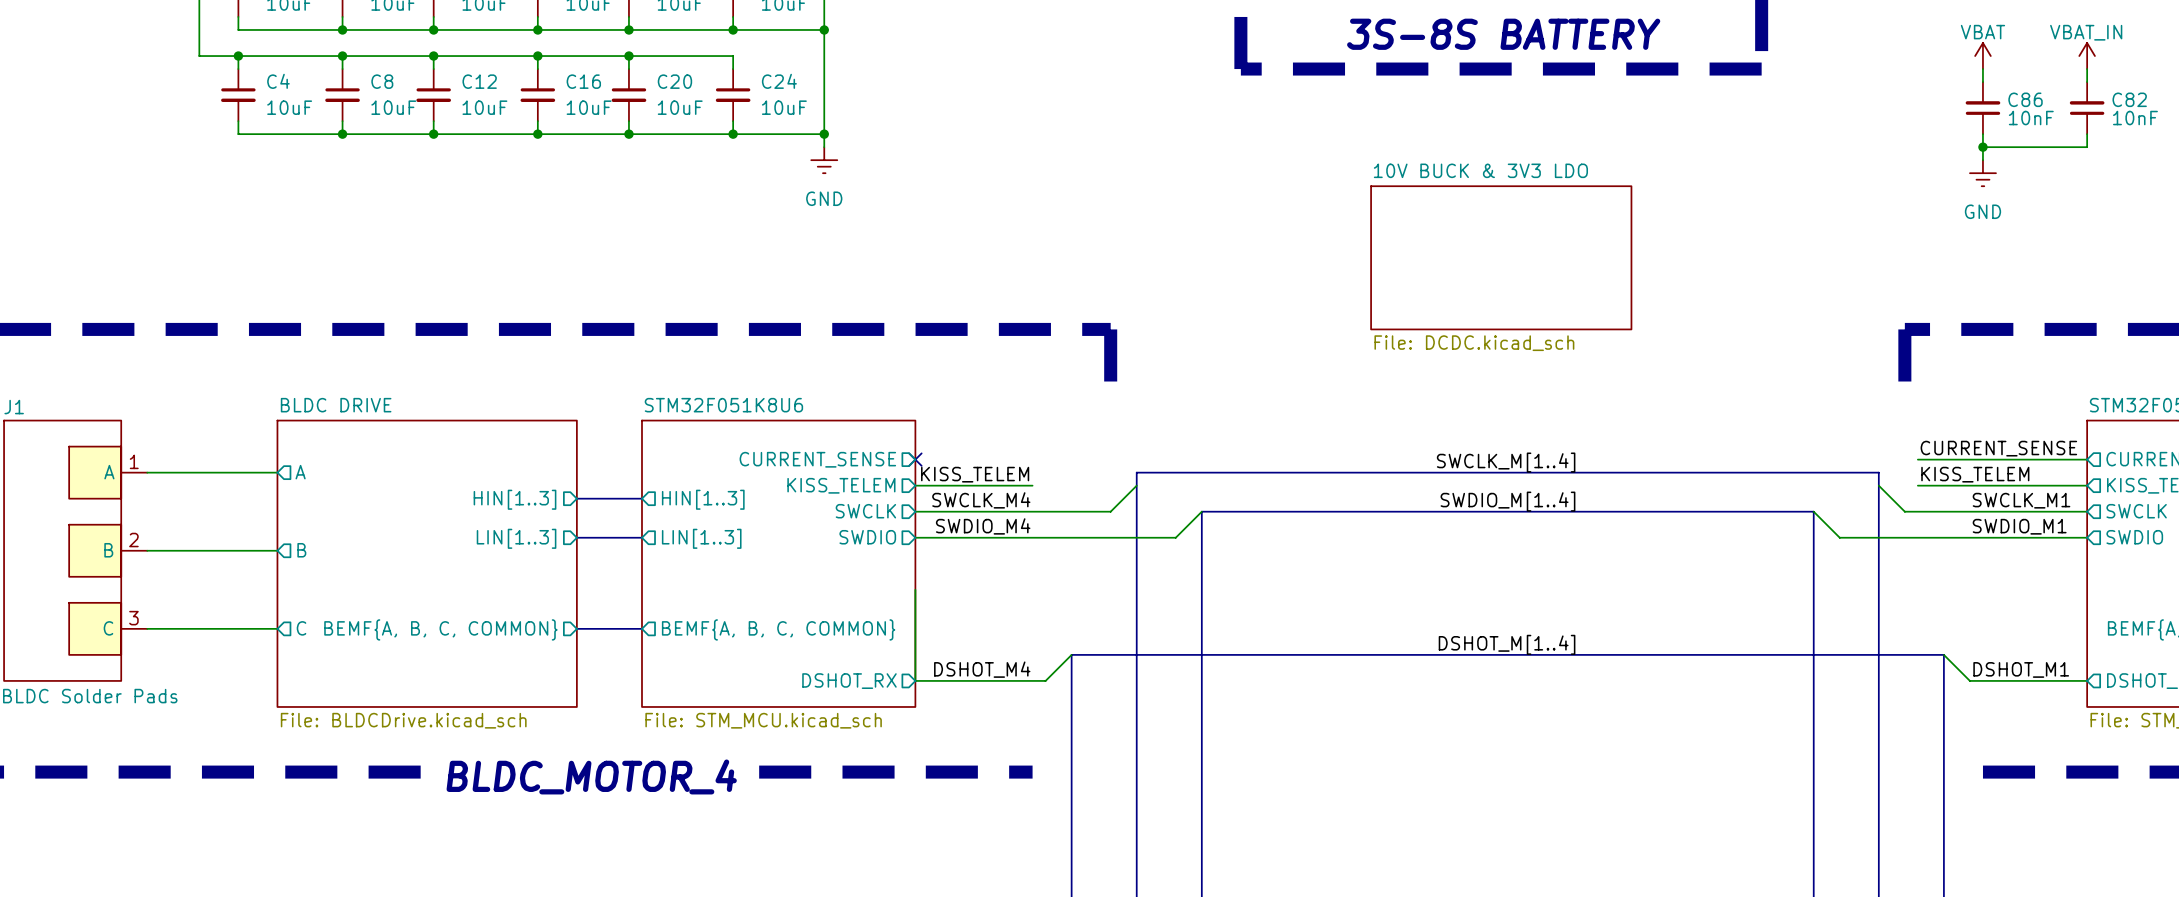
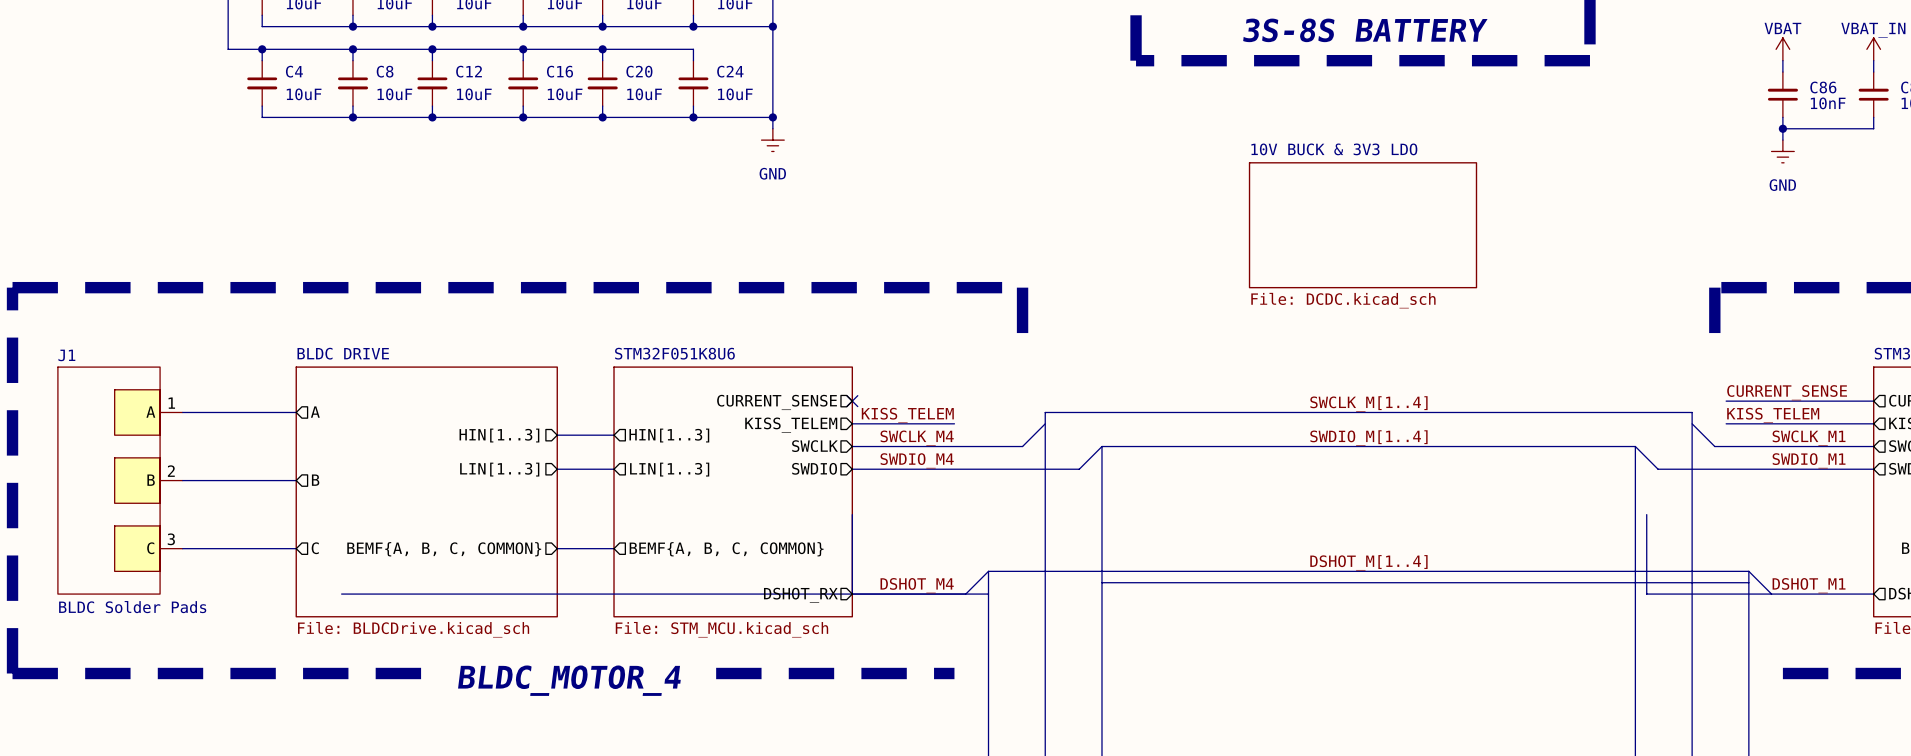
wire: none -> (1646, 514) (1646, 594) (1771, 594)
bus: none -> (1101, 582) (1748, 582)
bus: none -> (341, 594) (988, 594)

